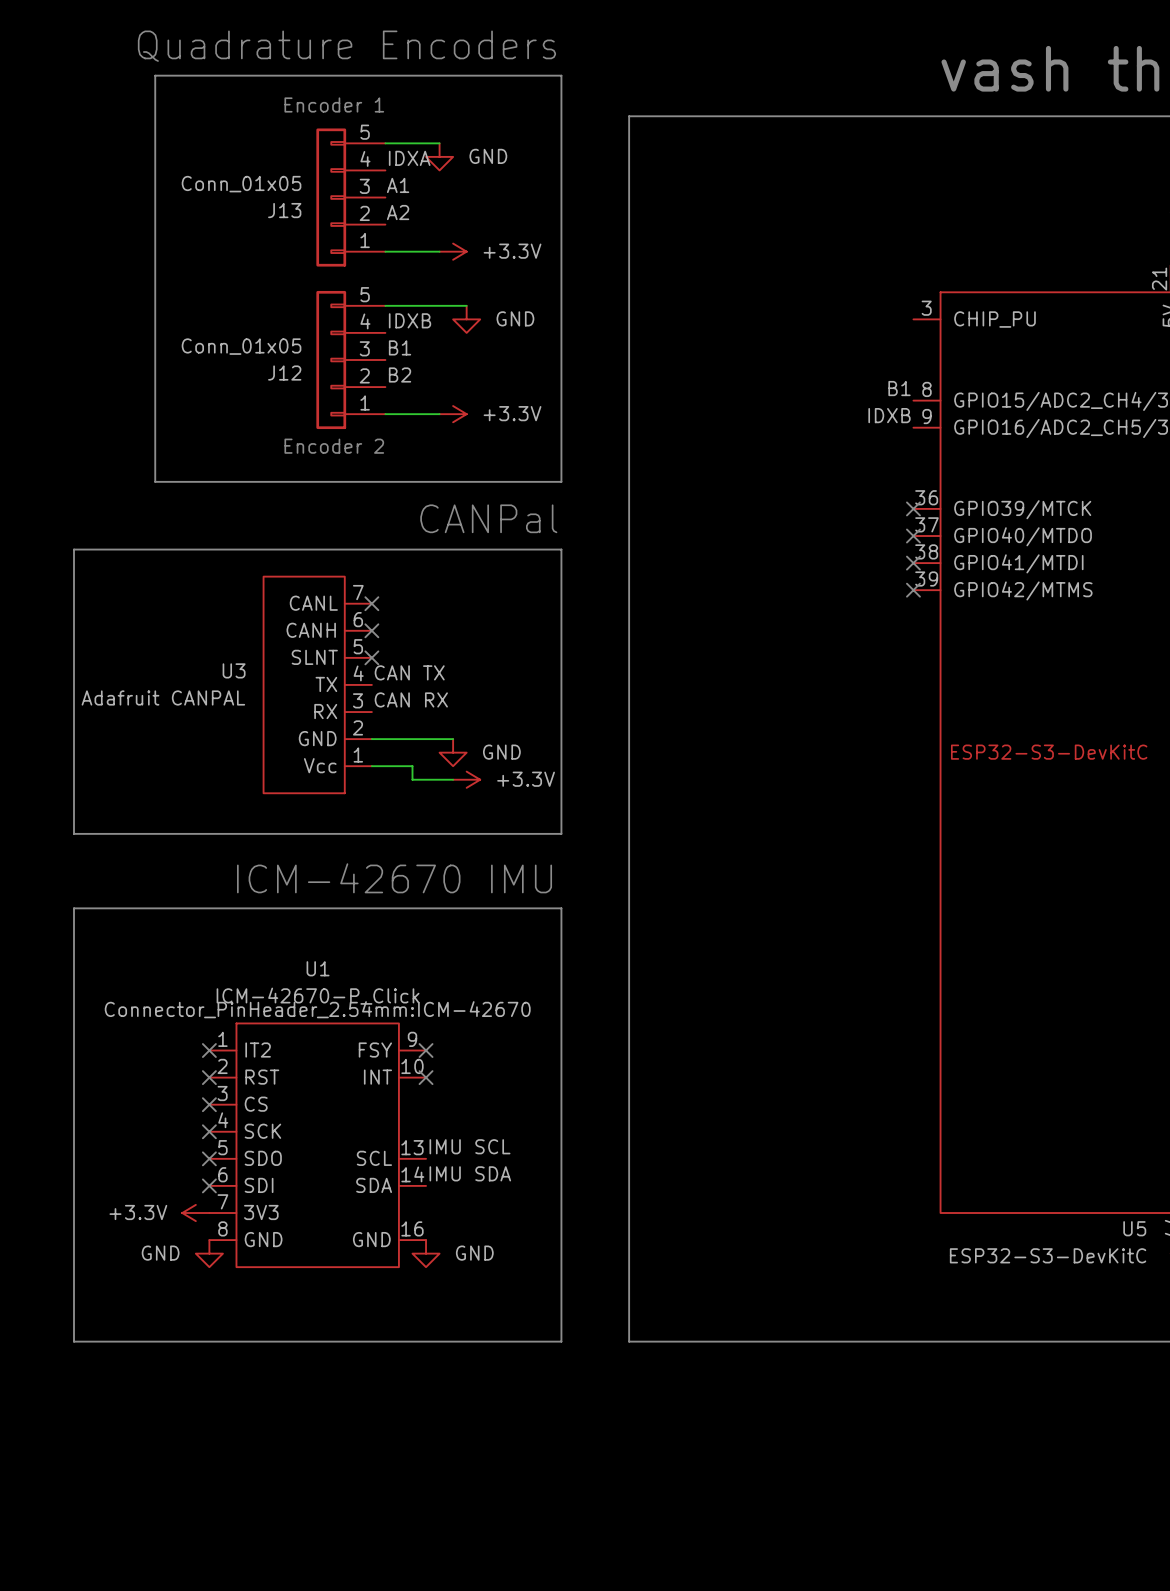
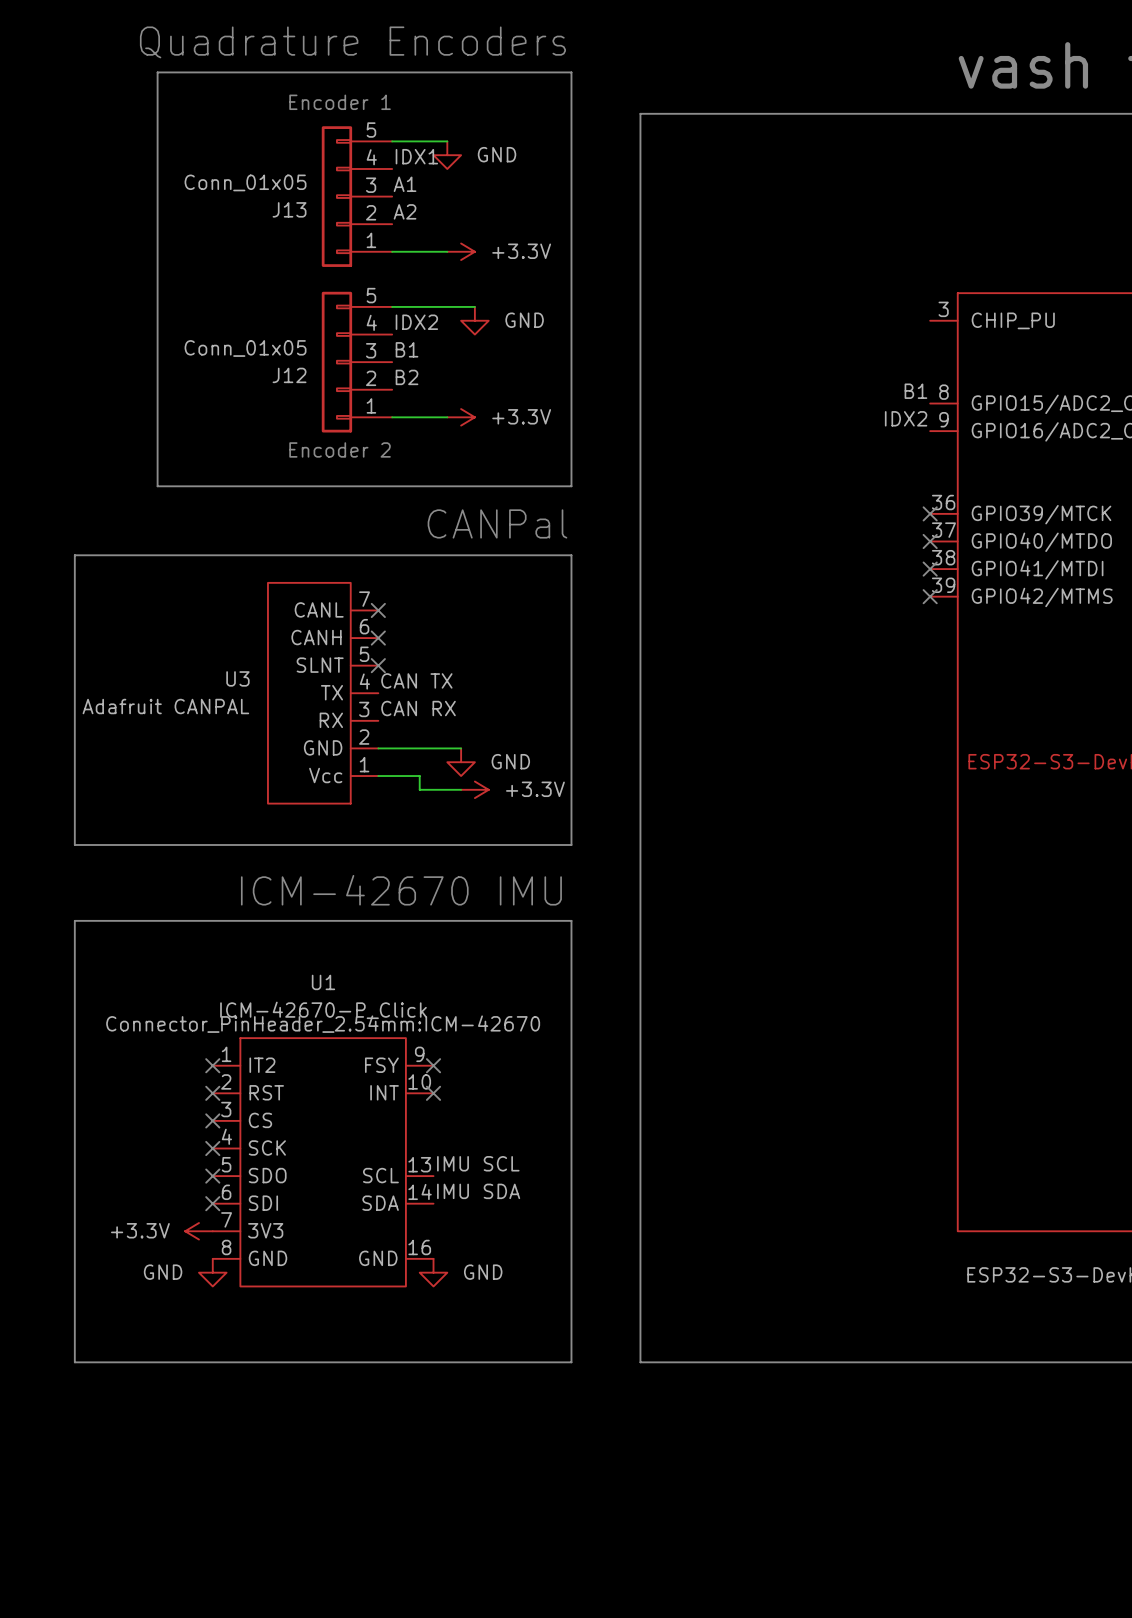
label: IDXA (409, 158) -> IDX1 (416, 156)
label: IDXB (410, 320) -> IDX2 (416, 322)
label: IDXB (889, 415) -> IDX2 (906, 418)

